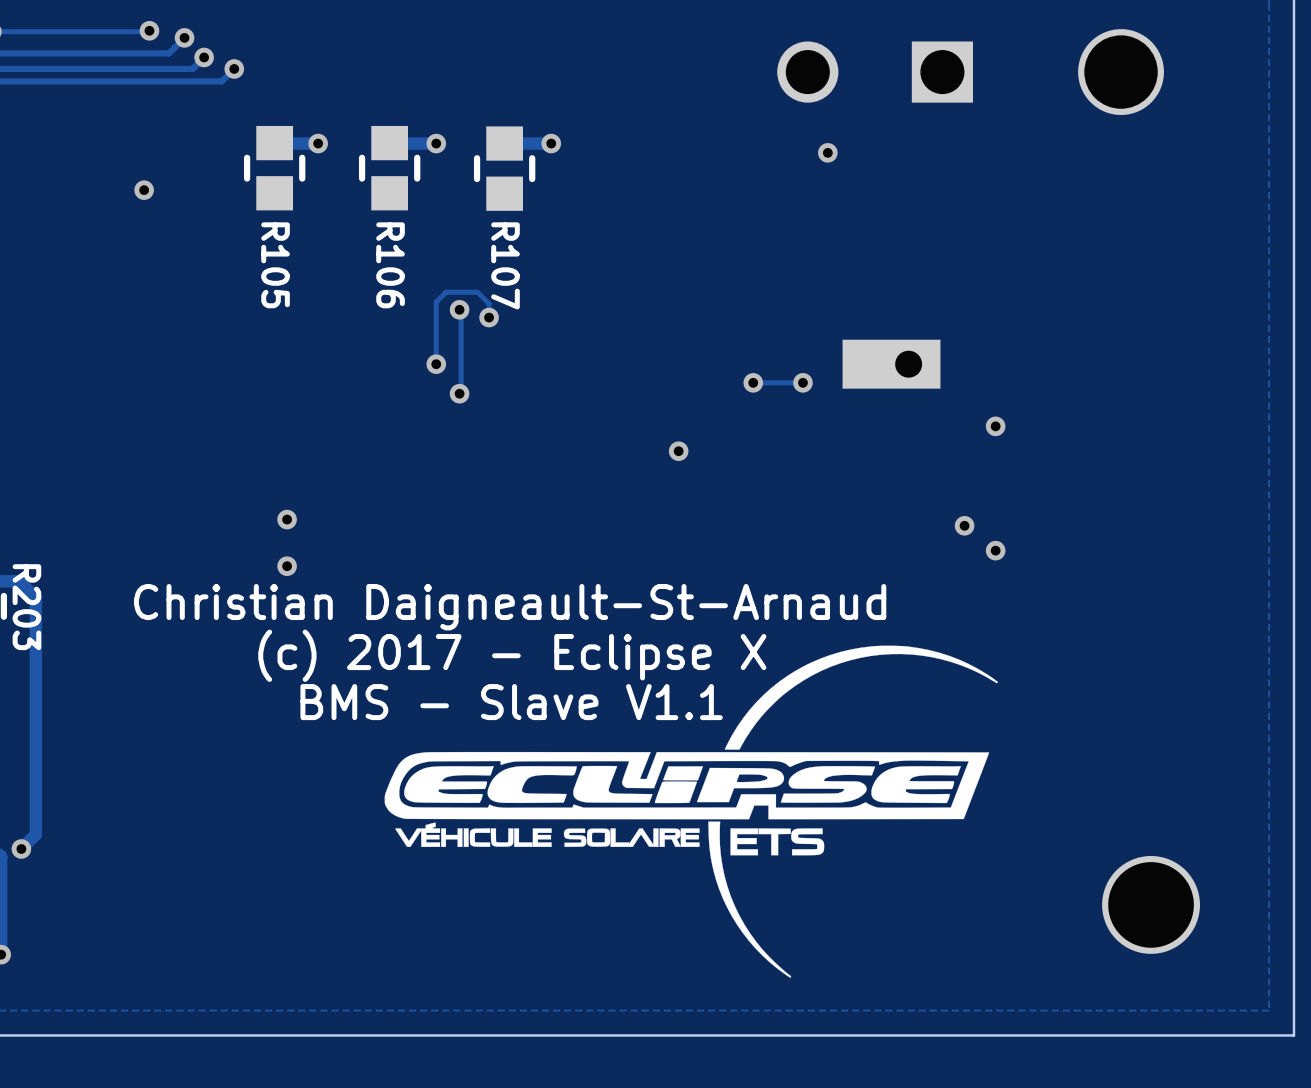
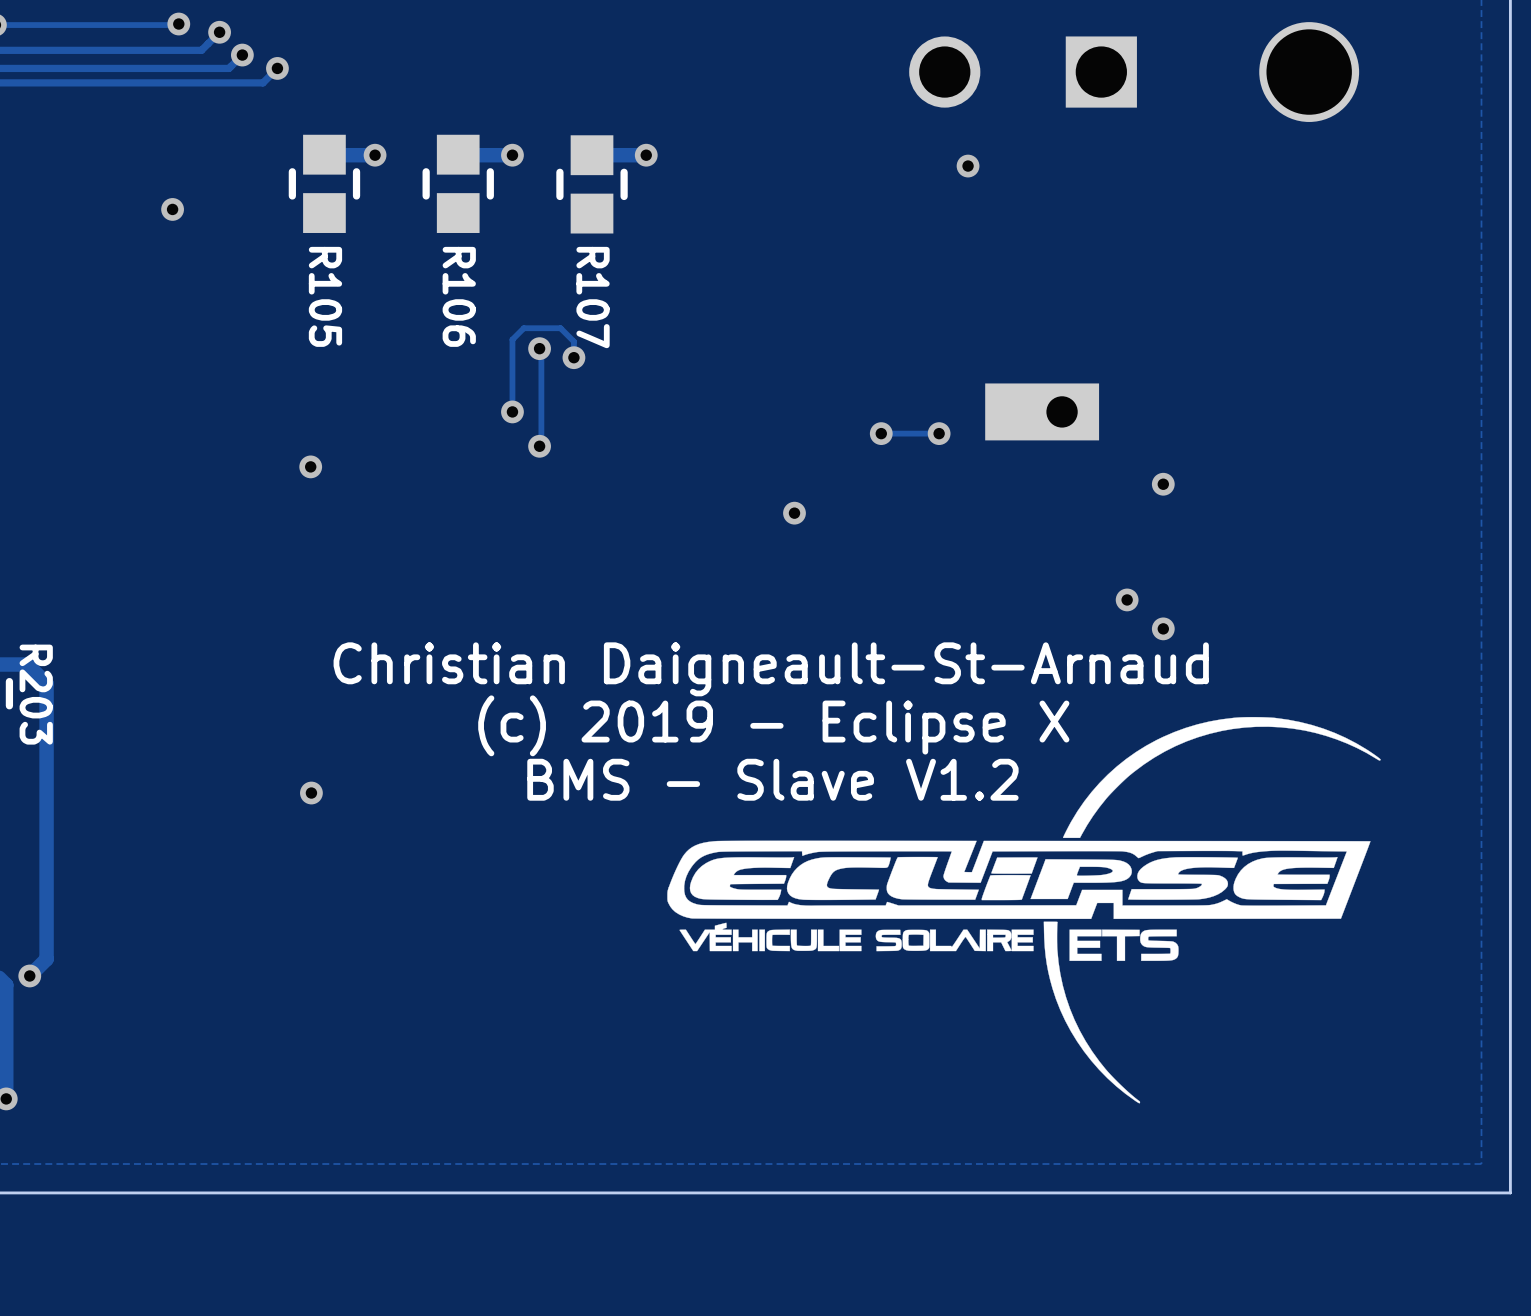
via: none -> (310, 466)
via: (287, 519) -> none
via: (287, 566) -> none
text position: Christian Daigneault-St-Arnaud (510, 607) -> Christian Daigneault-St-Arnaud (771, 669)
text: (c) 2017 - Eclipse X (512, 655) -> (c) 2019 - Eclipse X (773, 725)
via: none -> (311, 793)
text: BMS - Slave V1.1 (511, 702) -> BMS - Slave V1.2 (772, 779)
drawing position: (691, 811) -> (1024, 910)
part: (1151, 904) -> none

